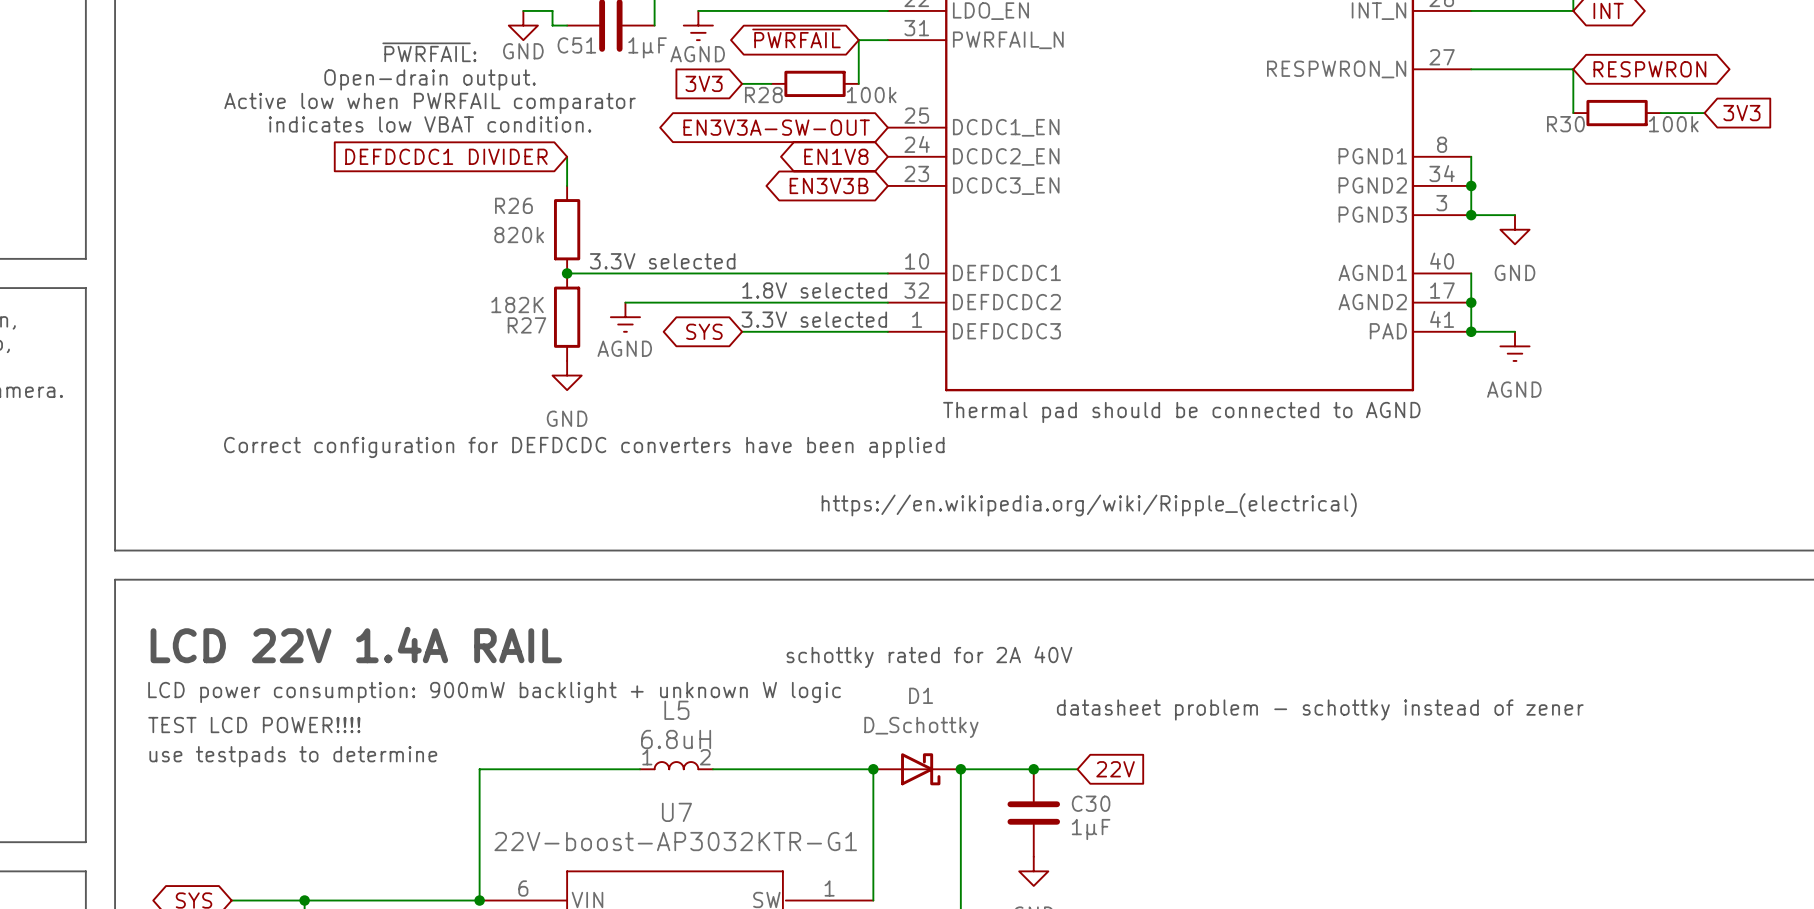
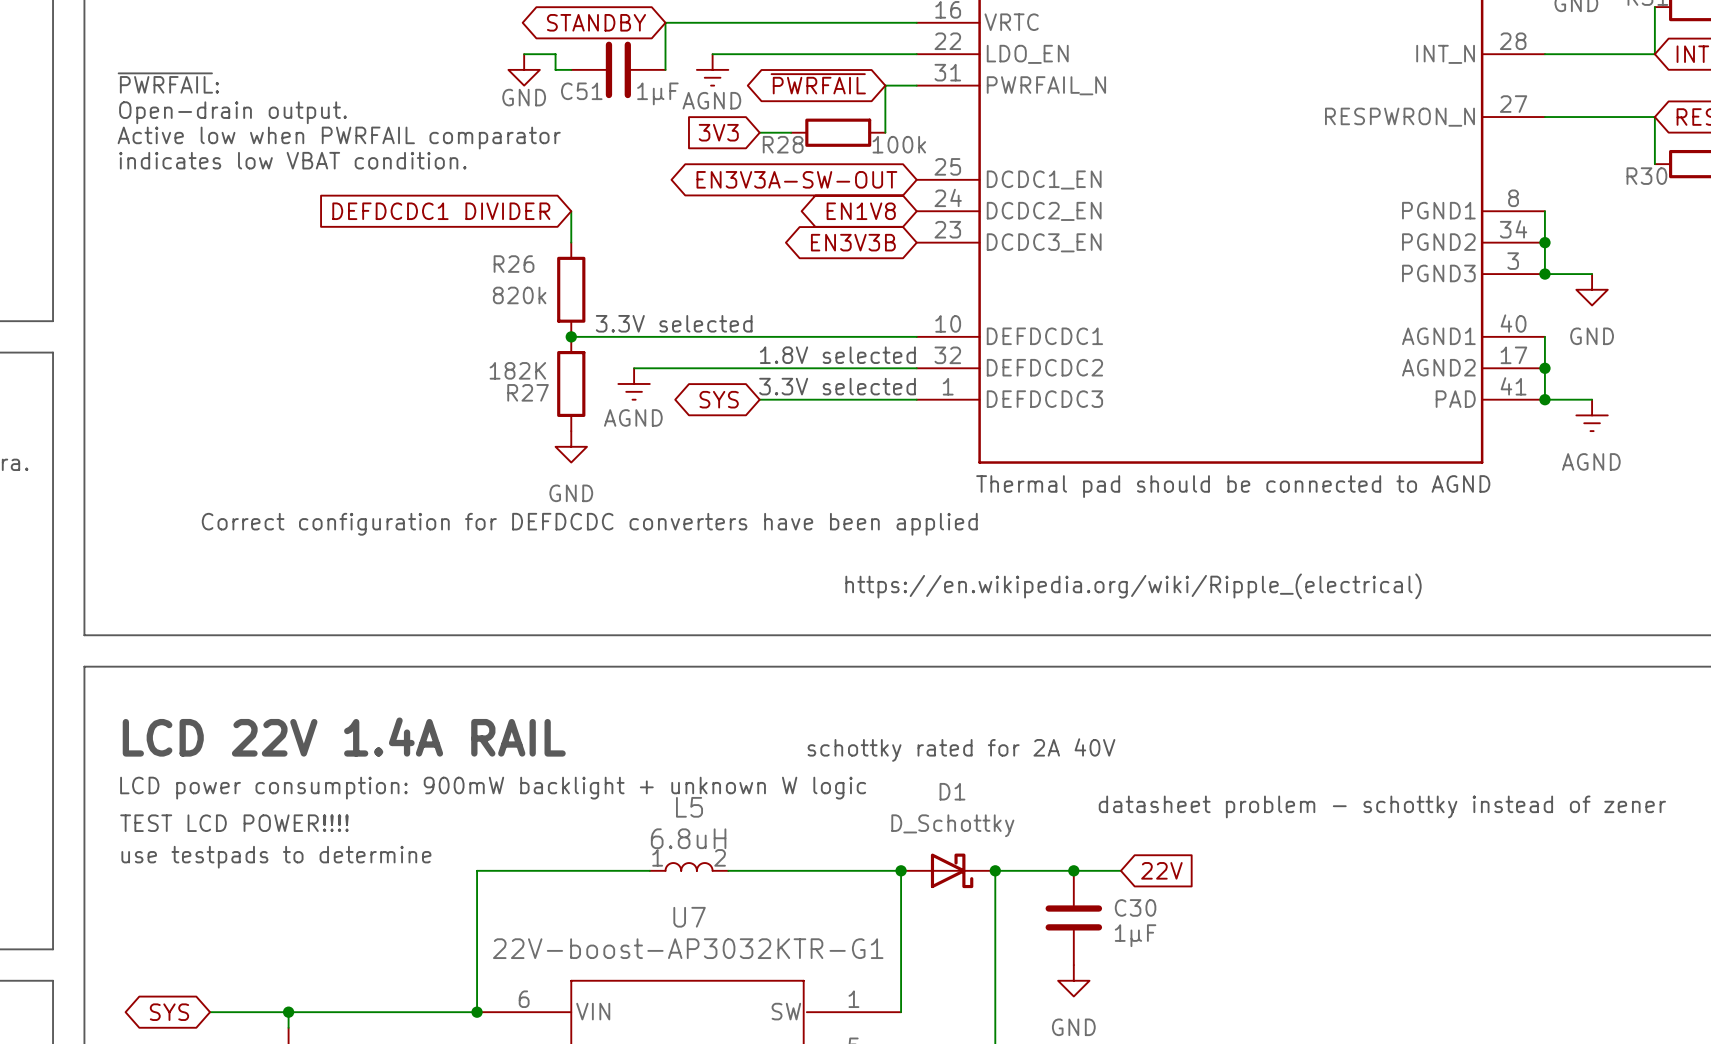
text position: ~{PWRFAIL}: (429, 52) -> ~{PWRFAIL}: (168, 83)
text position: Open-drain output. (430, 79) -> Open-drain output. (232, 112)
text position: Active low when PWRFAIL comparator (430, 103) -> Active low when PWRFAIL comparator (339, 138)
text position: indicates low VBAT condition. (430, 124) -> indicates low VBAT condition. (292, 160)

